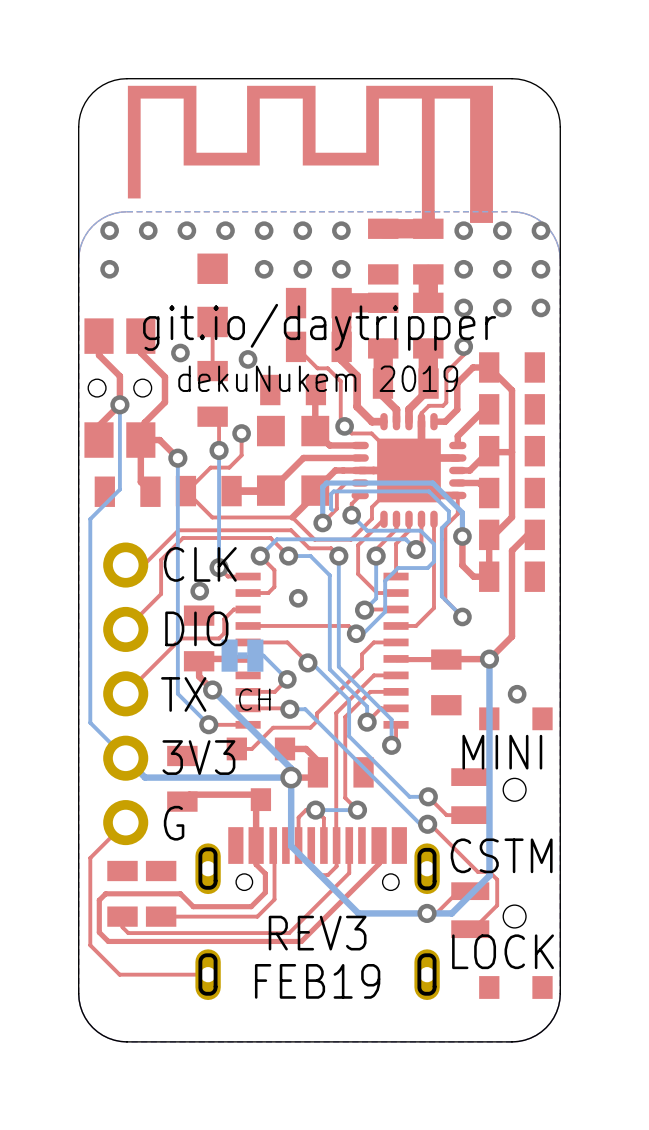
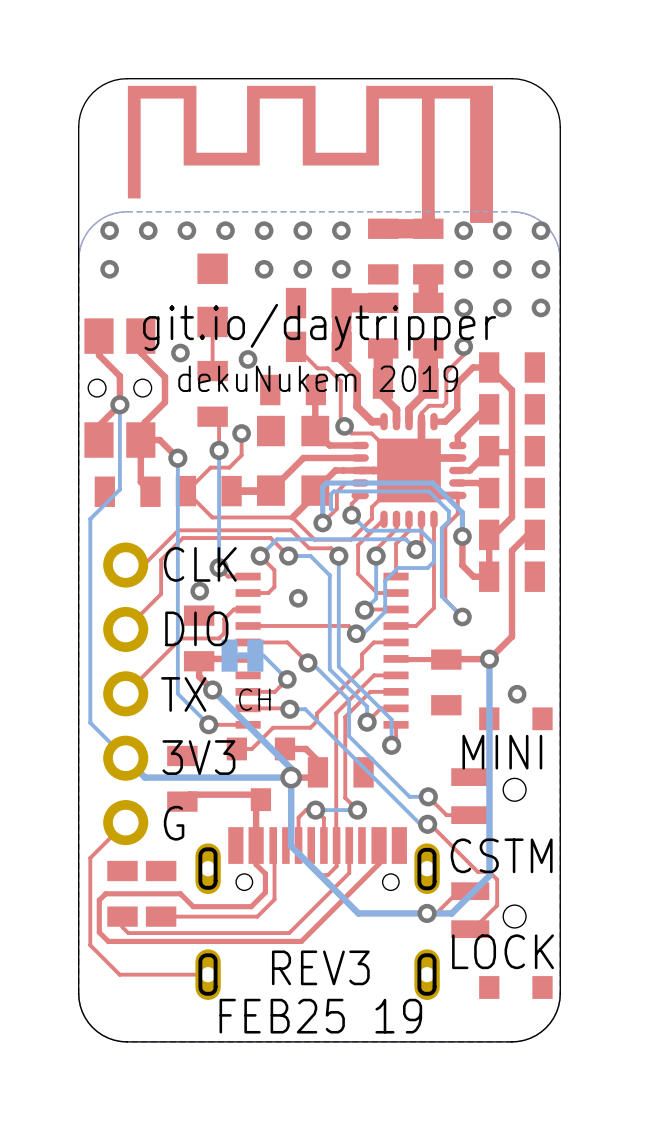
text position: REV3 (317, 933) -> REV3 (320, 967)
text: FEB19 (317, 981) -> FEB25 19 (320, 1016)

